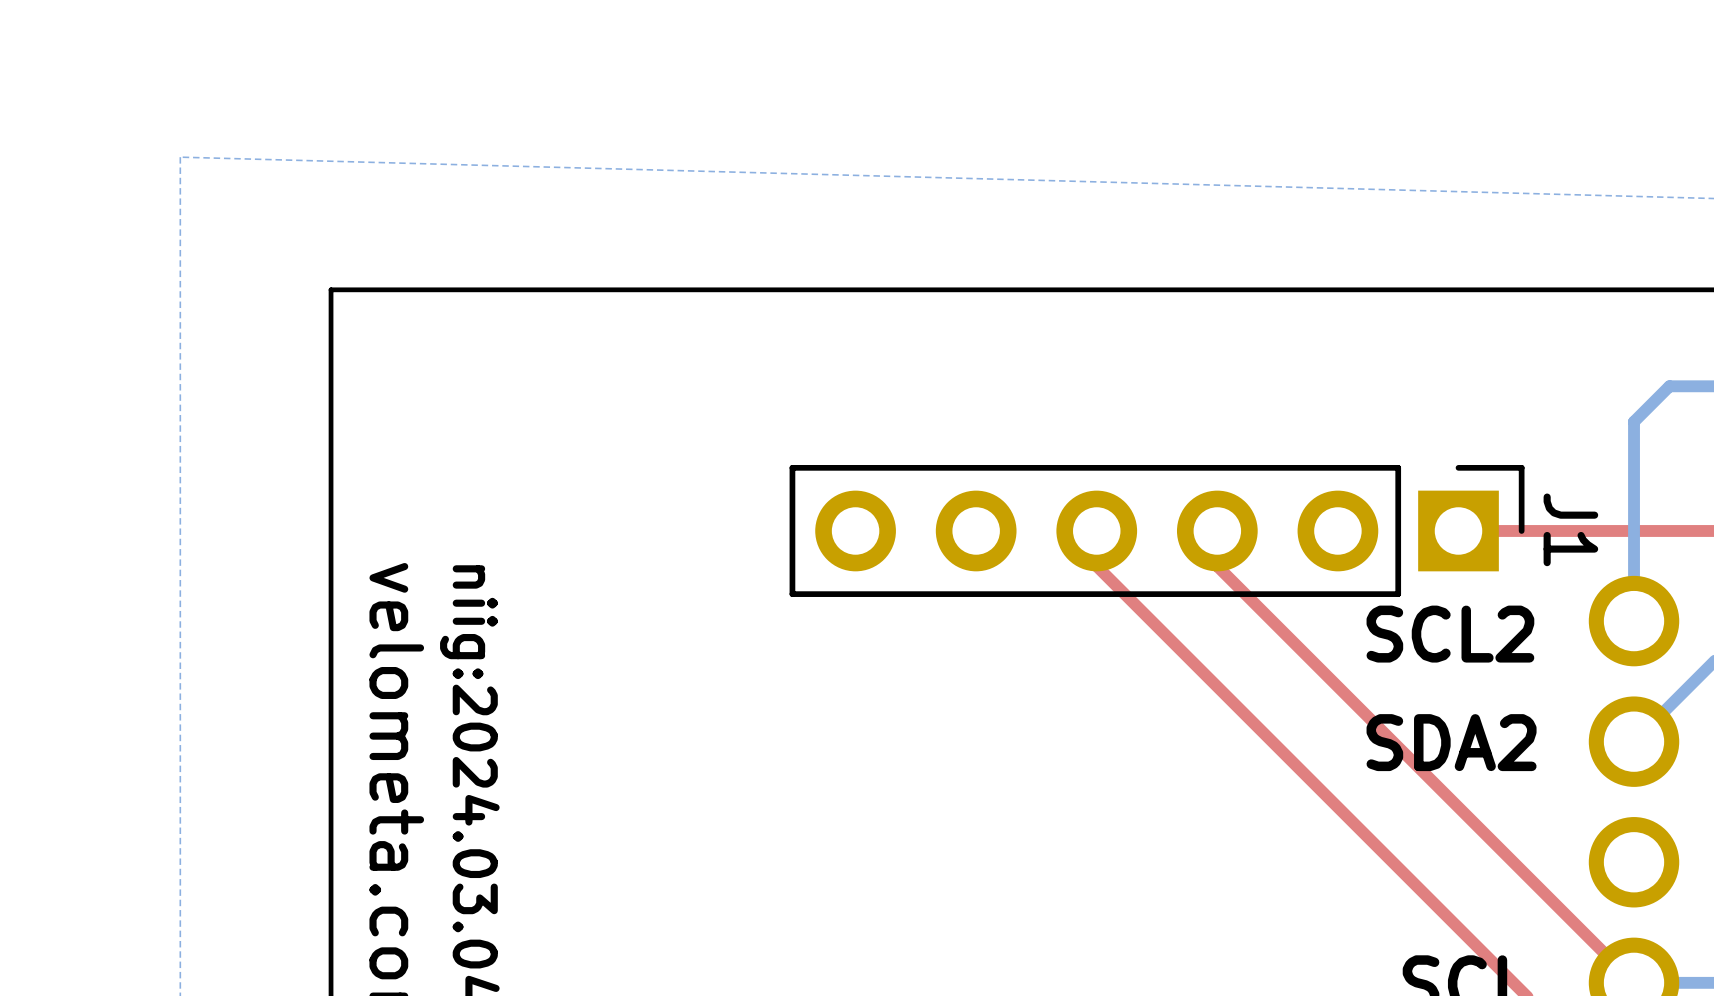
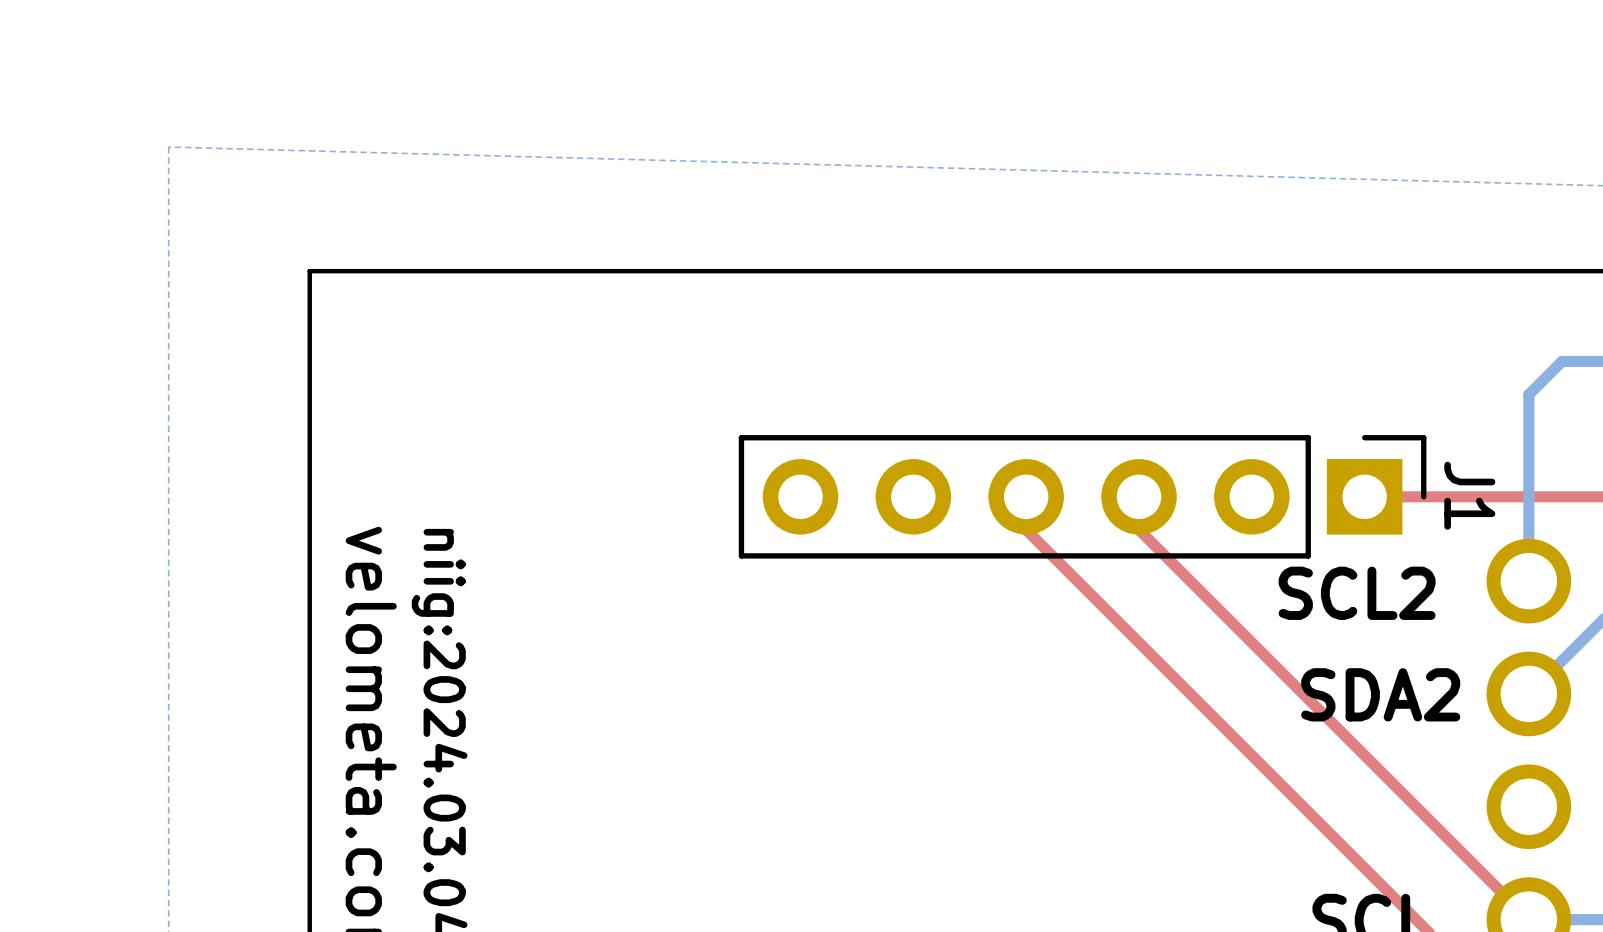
text position: SDA2 (1451, 742) -> SDA2 (1380, 694)

